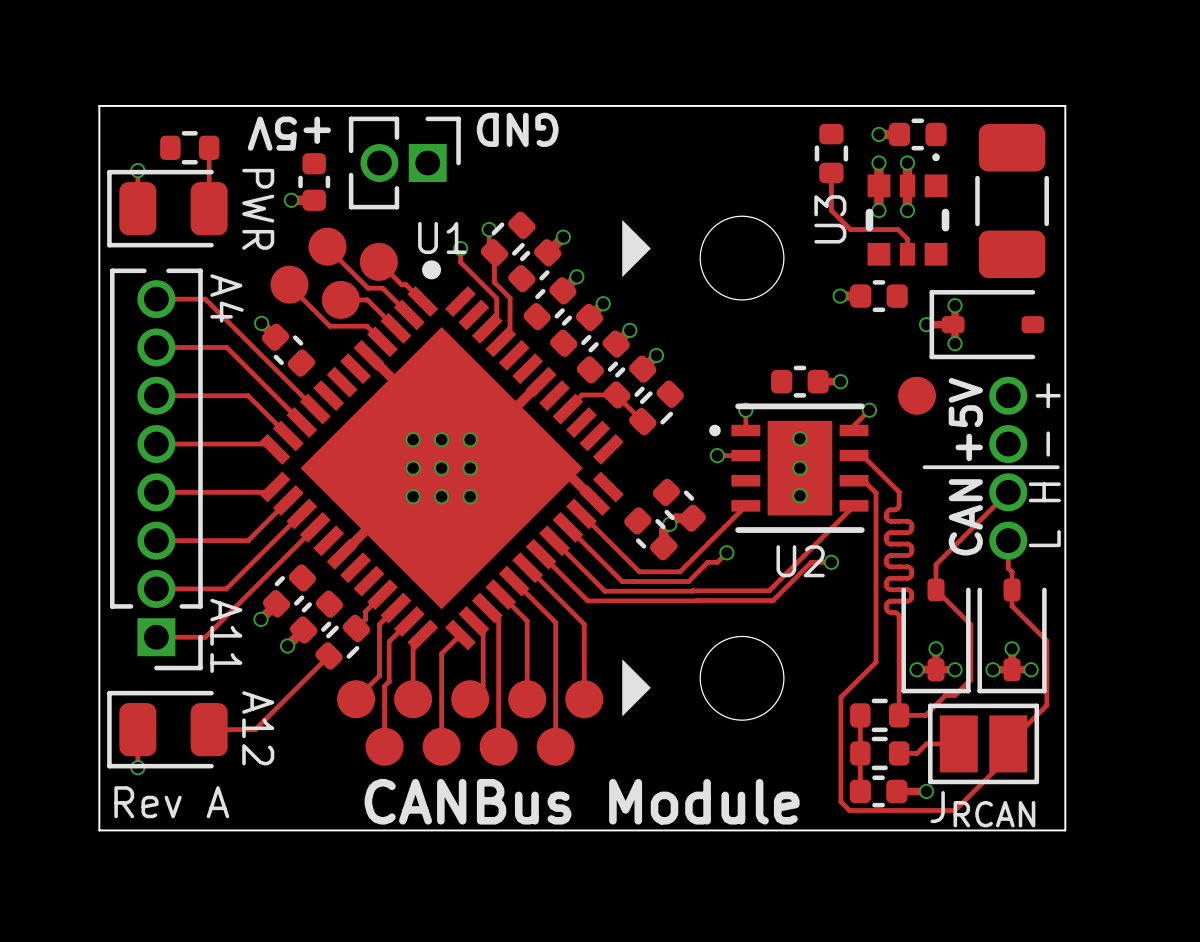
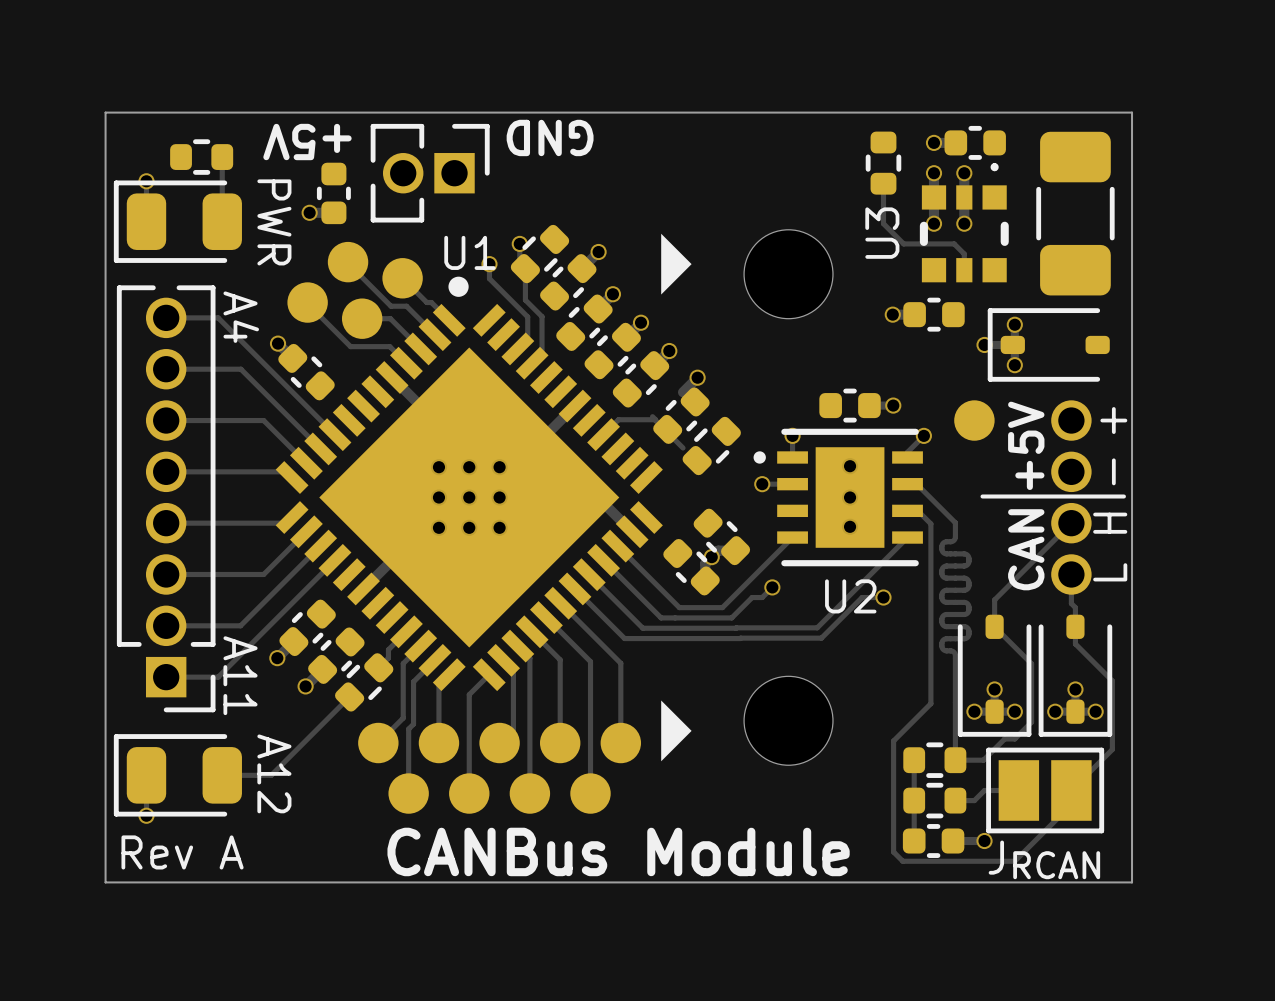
part position: (629, 382) -> (681, 415)
part position: (656, 407) -> (711, 445)

